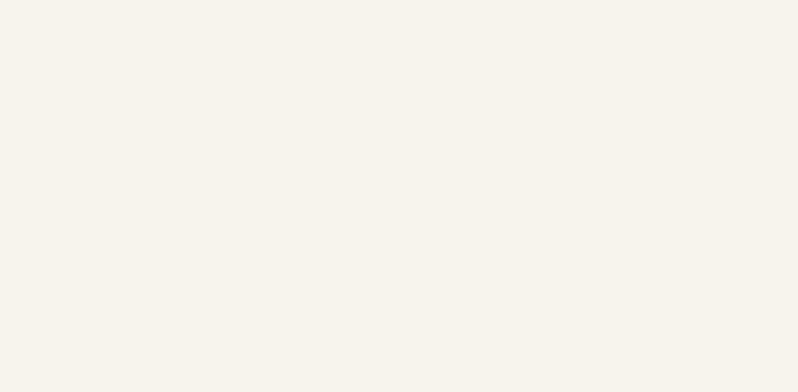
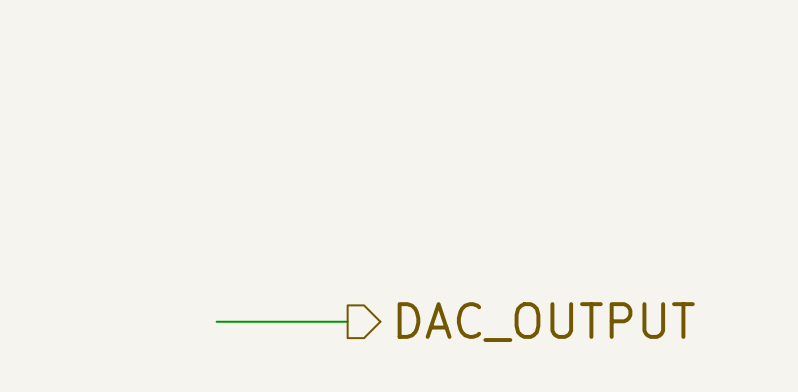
wire: none -> (216, 321) (347, 321)
hierarchical label: none -> DAC_OUTPUT (546, 322)

